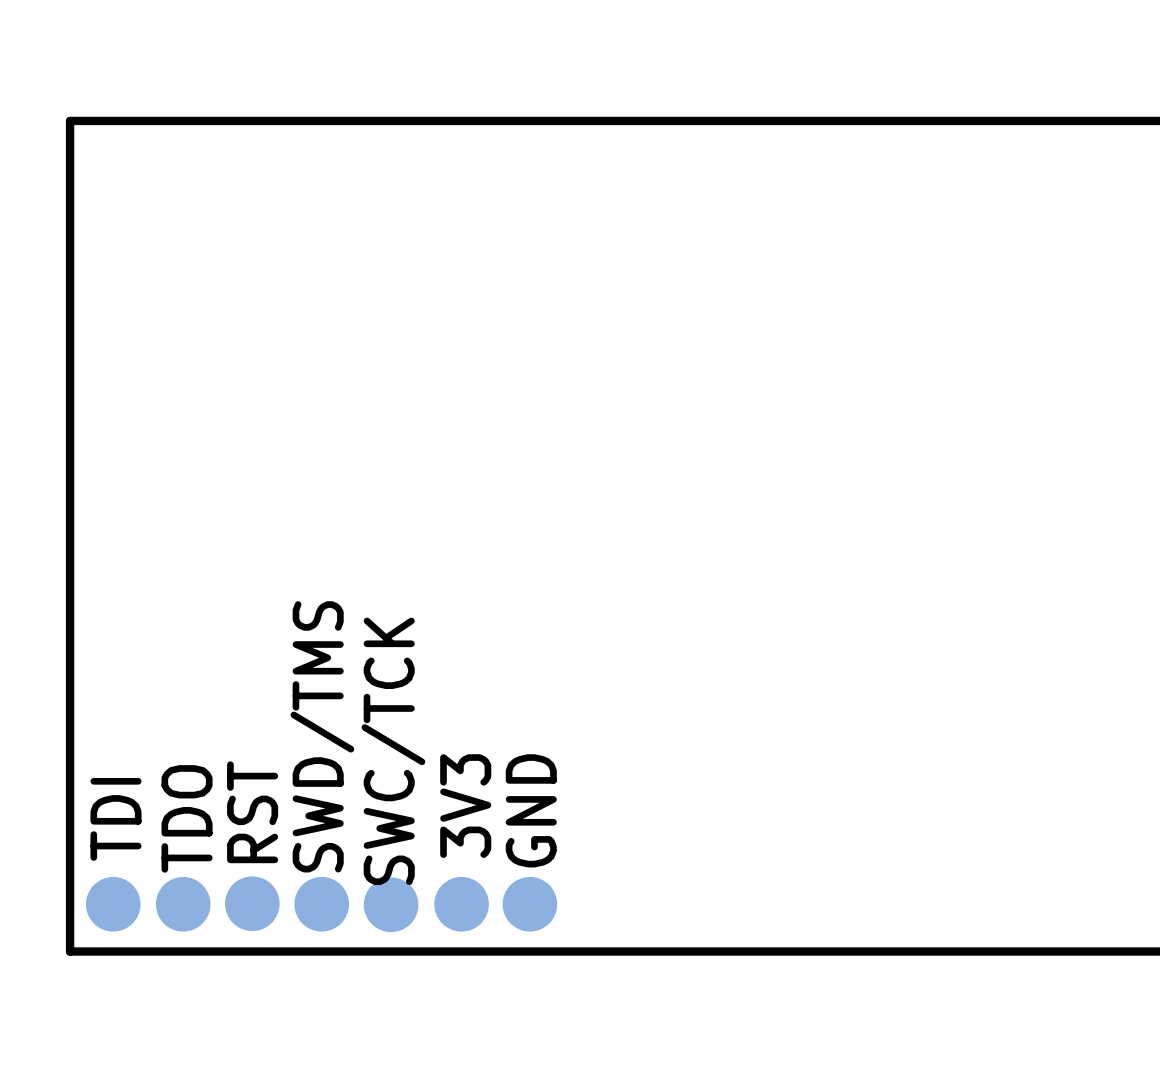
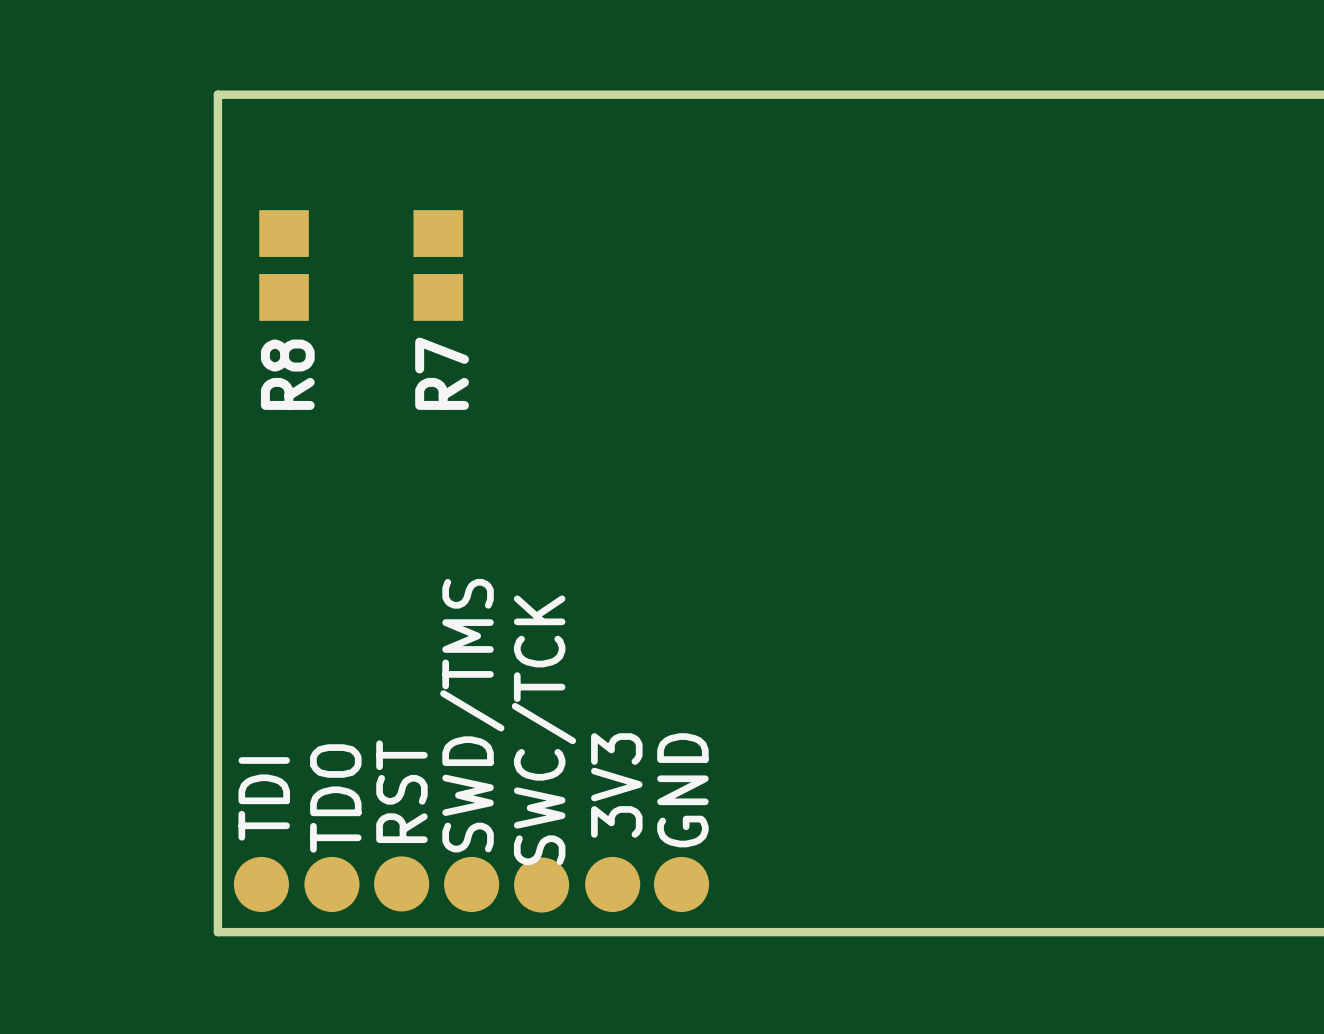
R8: none -> (284, 265)
R7: none -> (438, 265)

